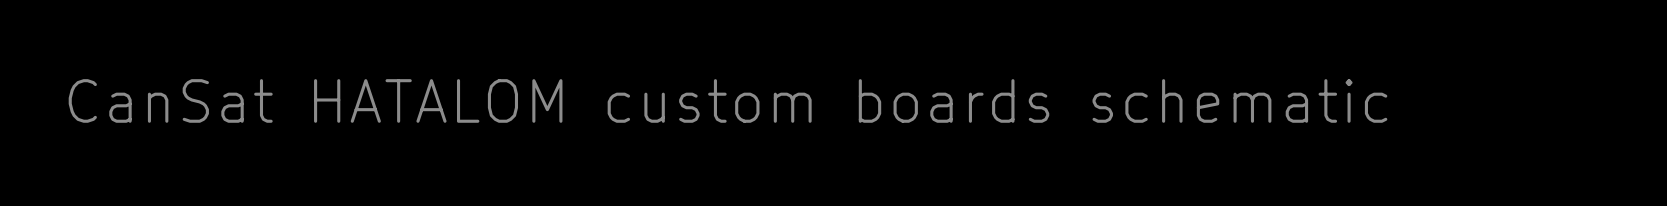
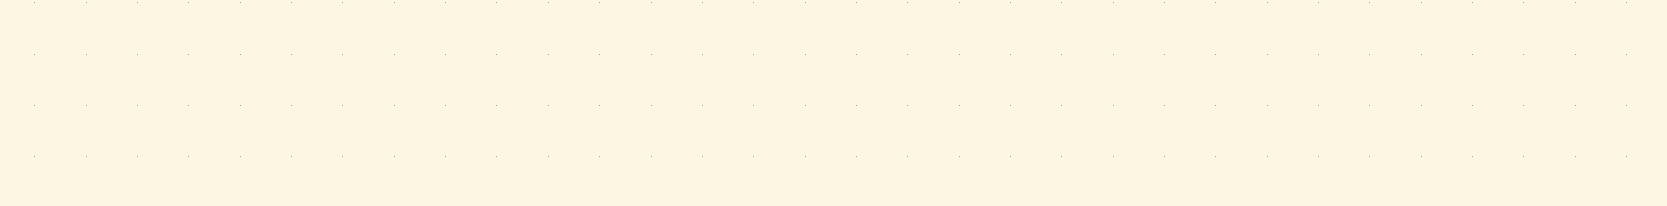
text: CanSat HATALOM custom boards schematic (728, 100) -> none

